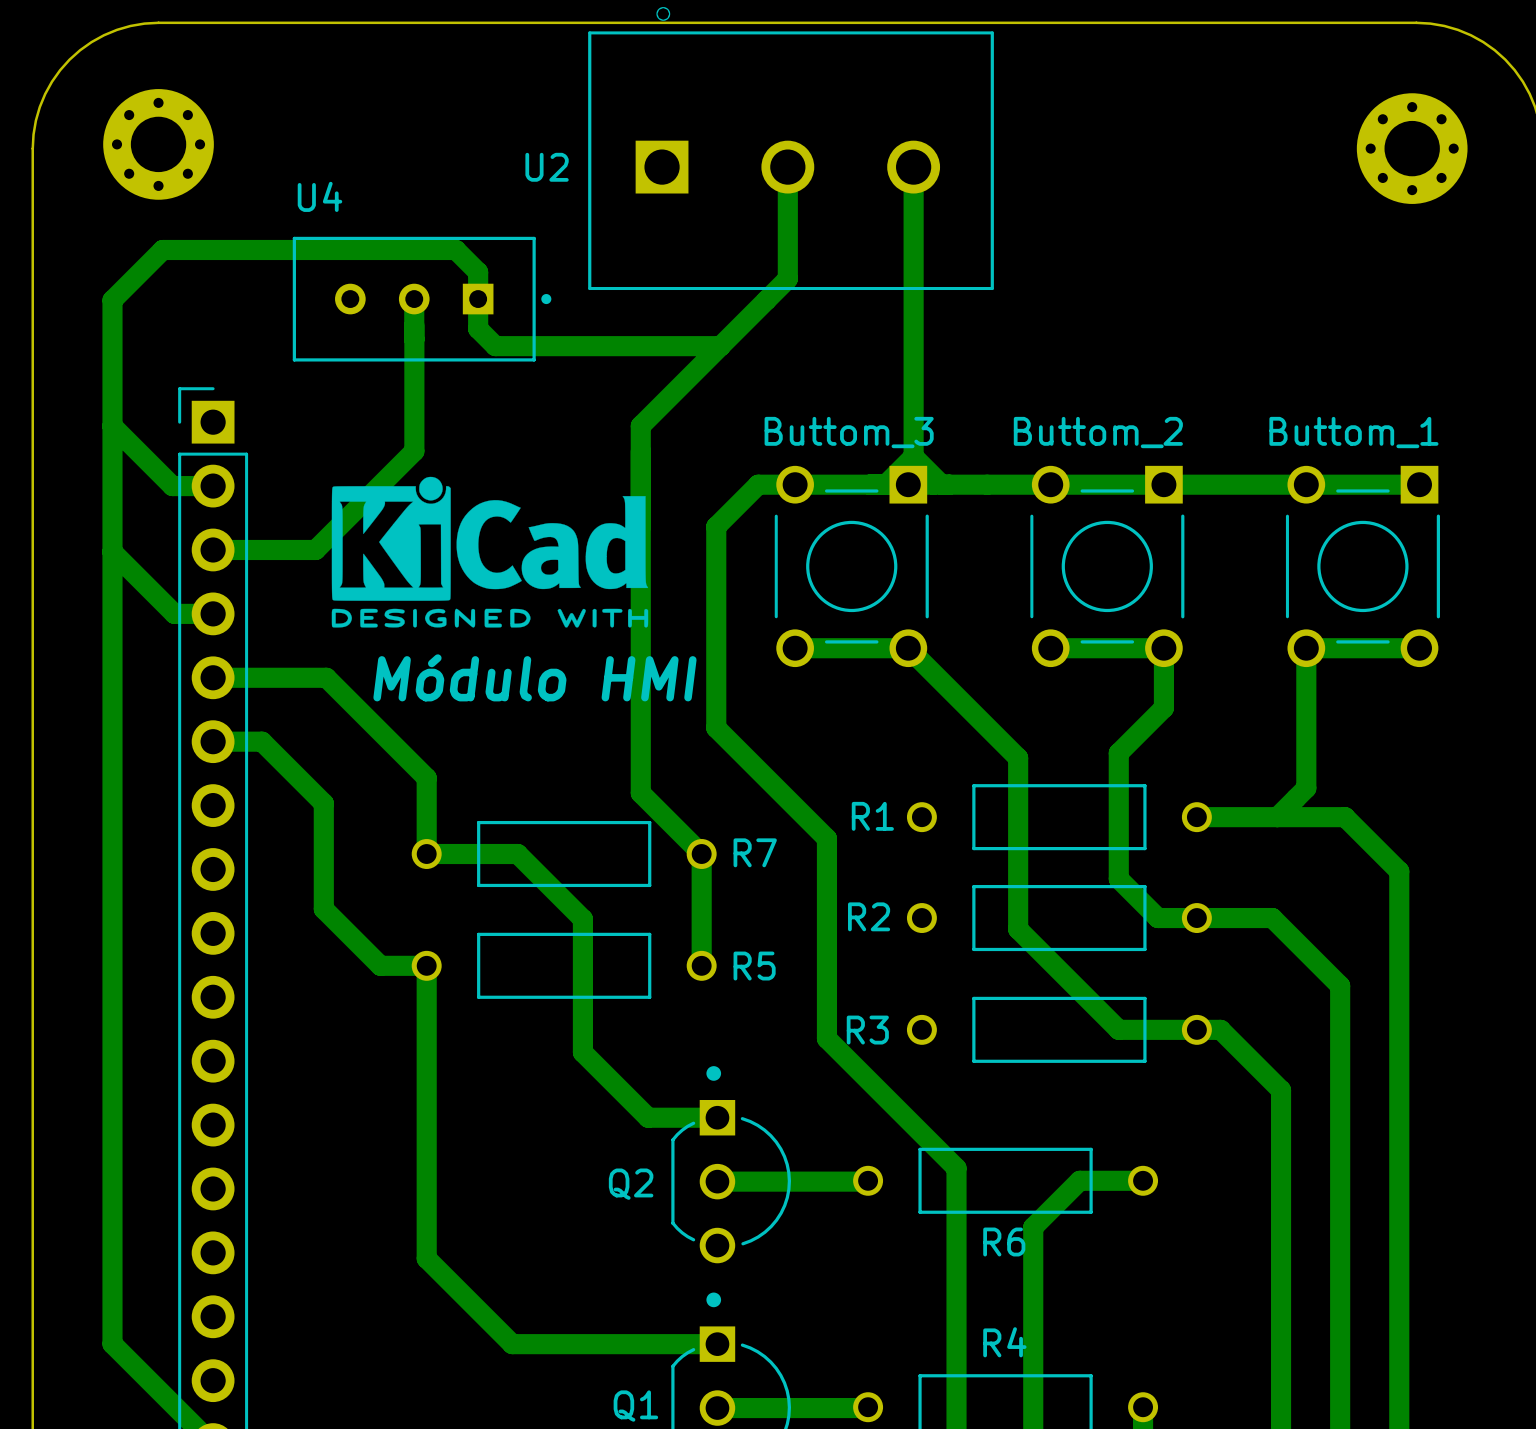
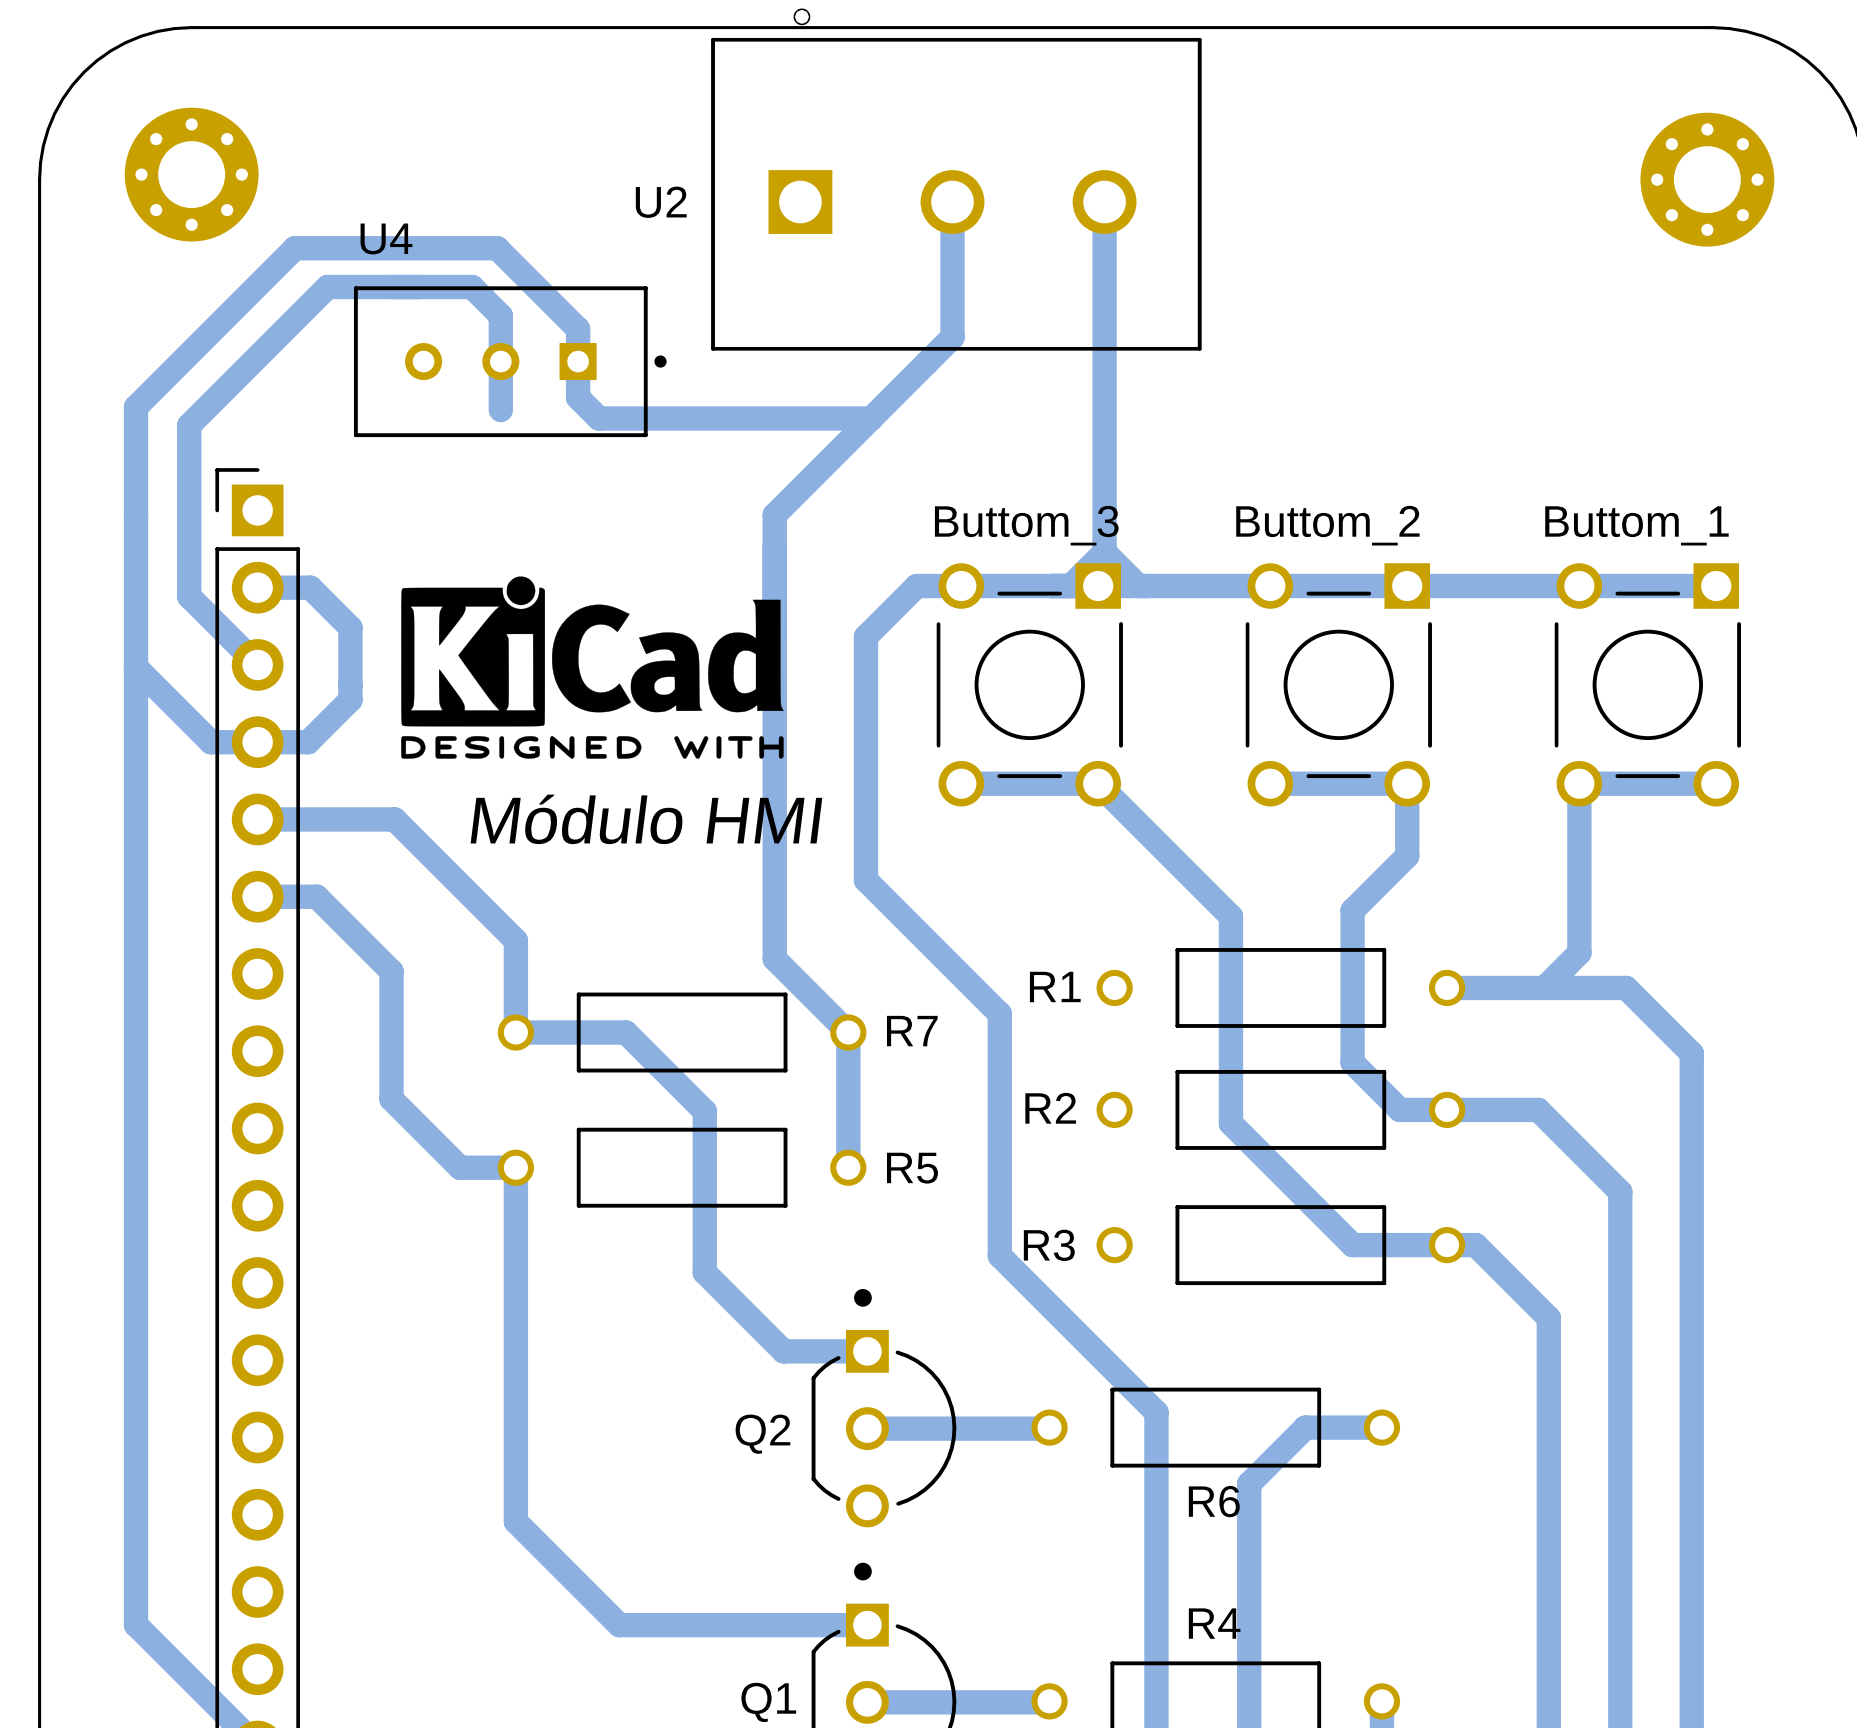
bottom track: (455, 249) (162, 249) (112, 300) (112, 336) -> (551, 302) (497, 248) (294, 248) (136, 407)
bottom track: (414, 325) (414, 451) (315, 549) (213, 549) -> (500, 361) (500, 315) (472, 287) (327, 287) (189, 425) (189, 596) (257, 664)
bottom track: (112, 426) (172, 486) (213, 486) -> (257, 742) (308, 742) (350, 699) (350, 627) (310, 587) (257, 587)

